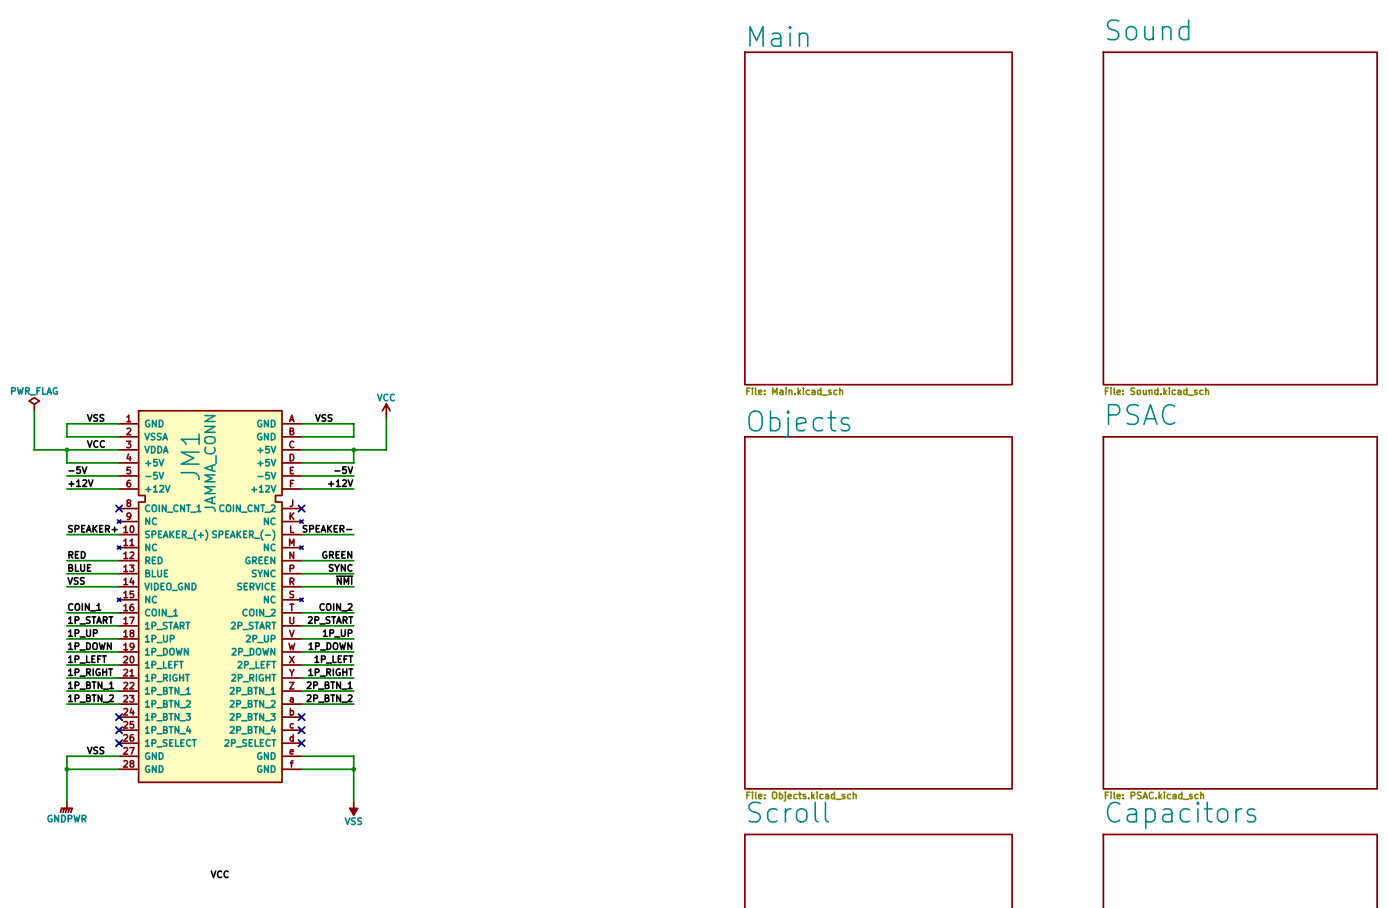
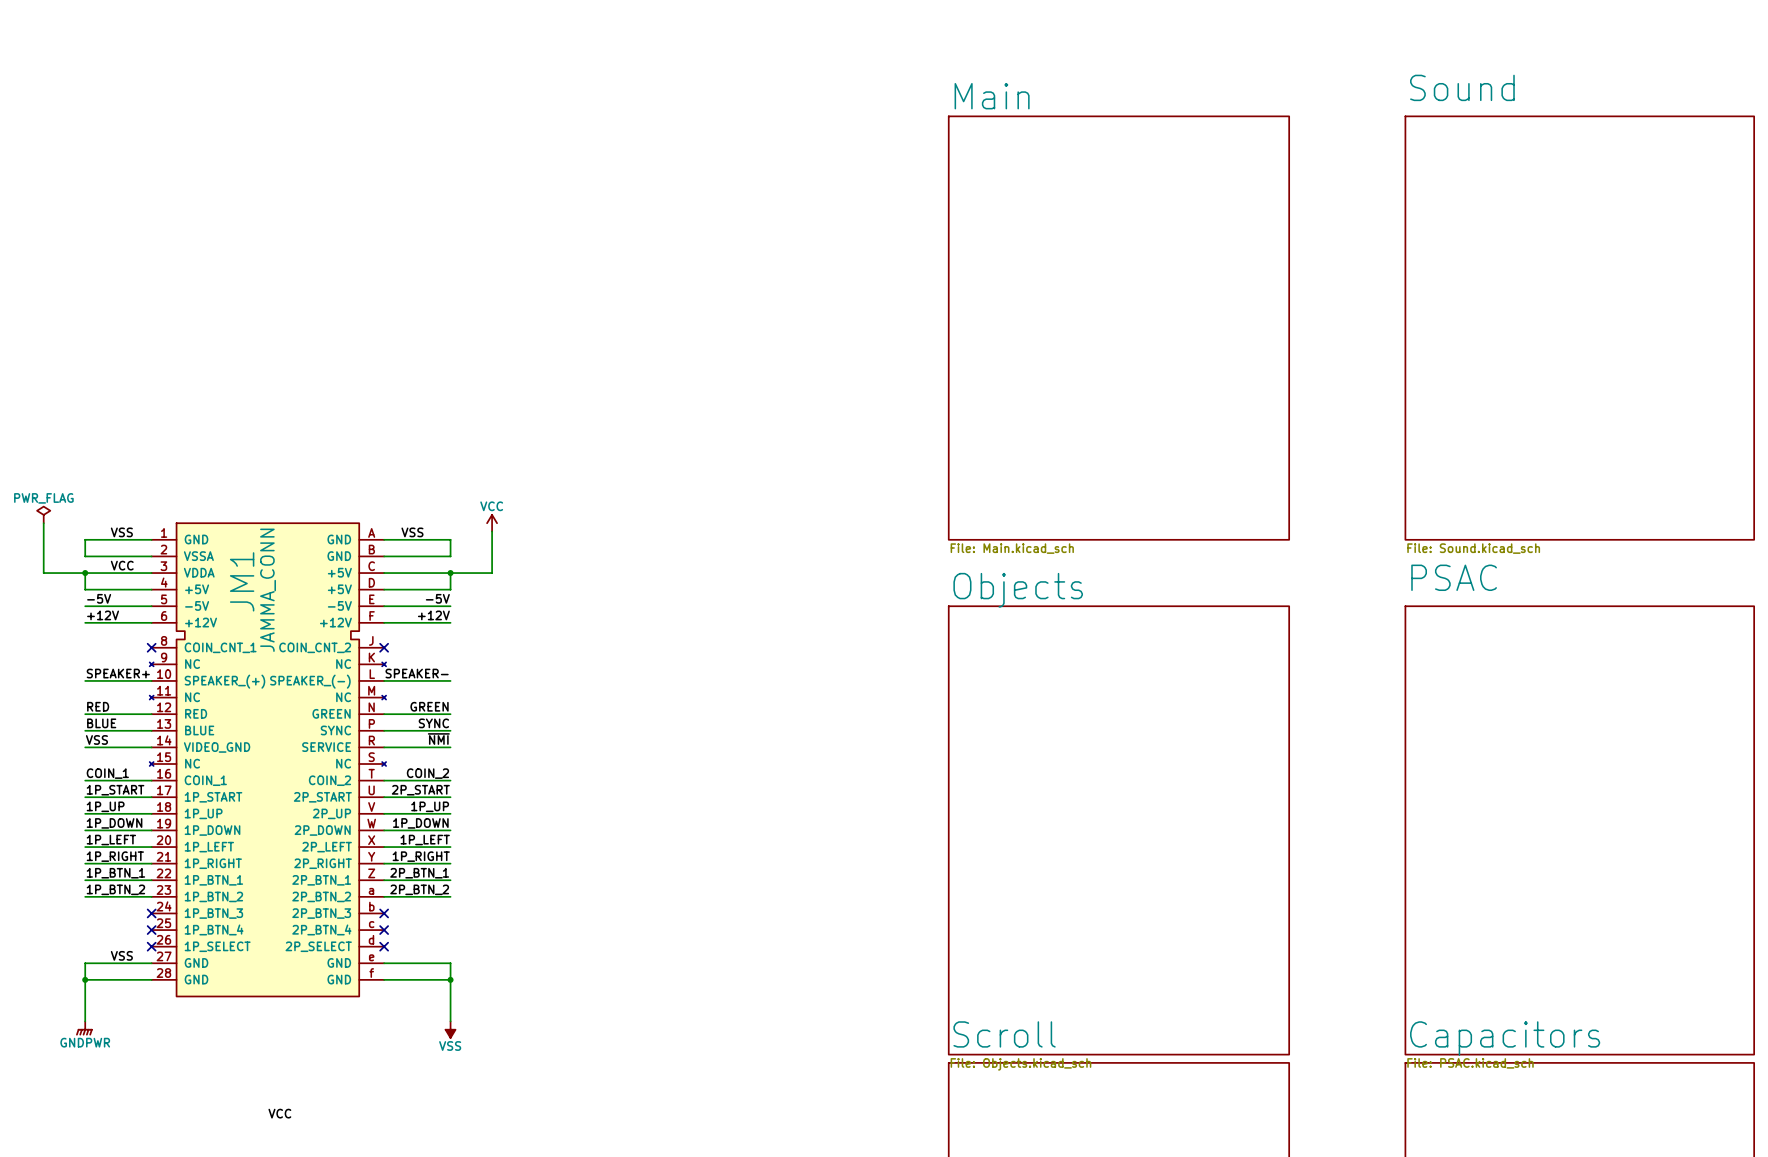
sheet Main position: (878, 218) -> (1118, 328)
sheet Sound position: (1240, 218) -> (1579, 328)
sheet Objects position: (878, 612) -> (1118, 830)
sheet PSAC position: (1240, 612) -> (1579, 830)

